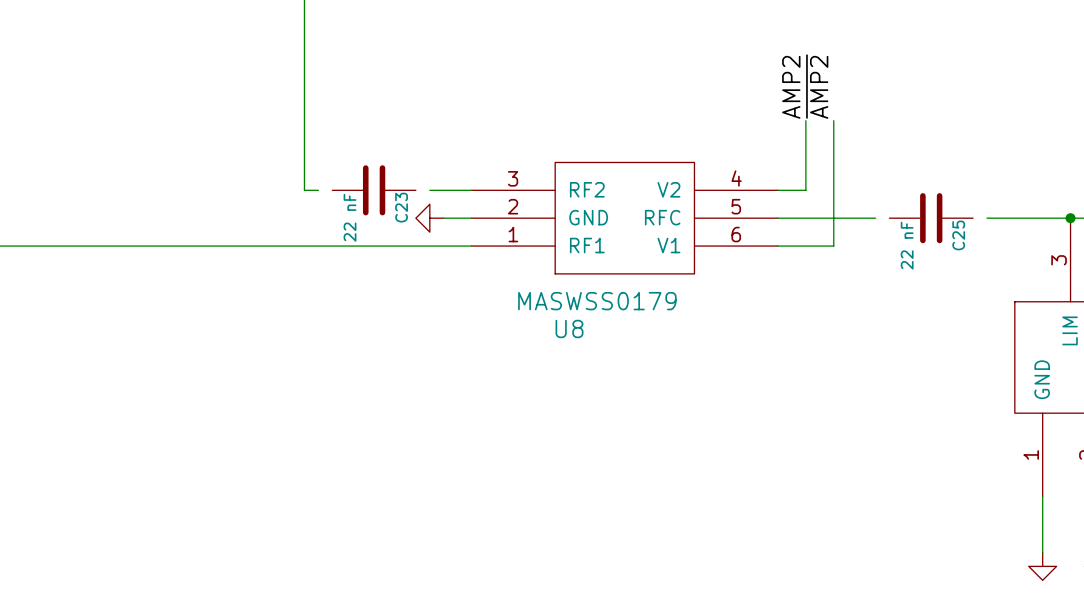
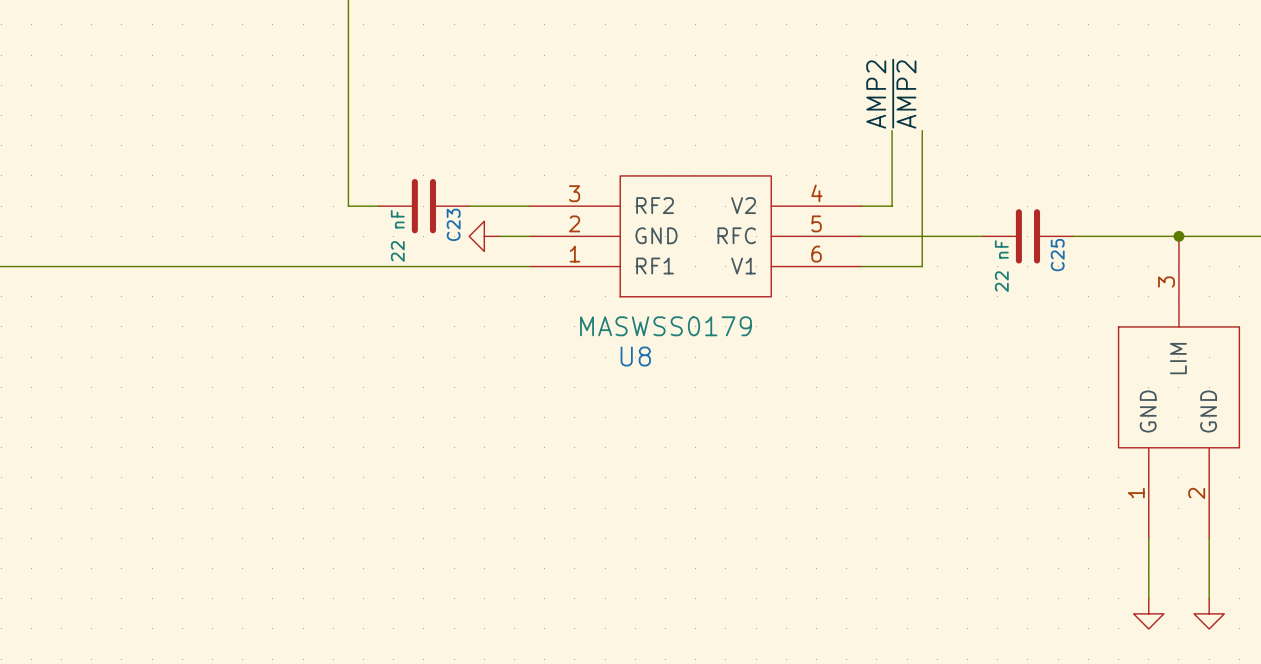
wire: none -> (363, 206) (378, 206)
wire: none -> (469, 206) (484, 206)
wire: none -> (967, 236) (982, 236)
wire: none -> (1073, 236) (1088, 236)

